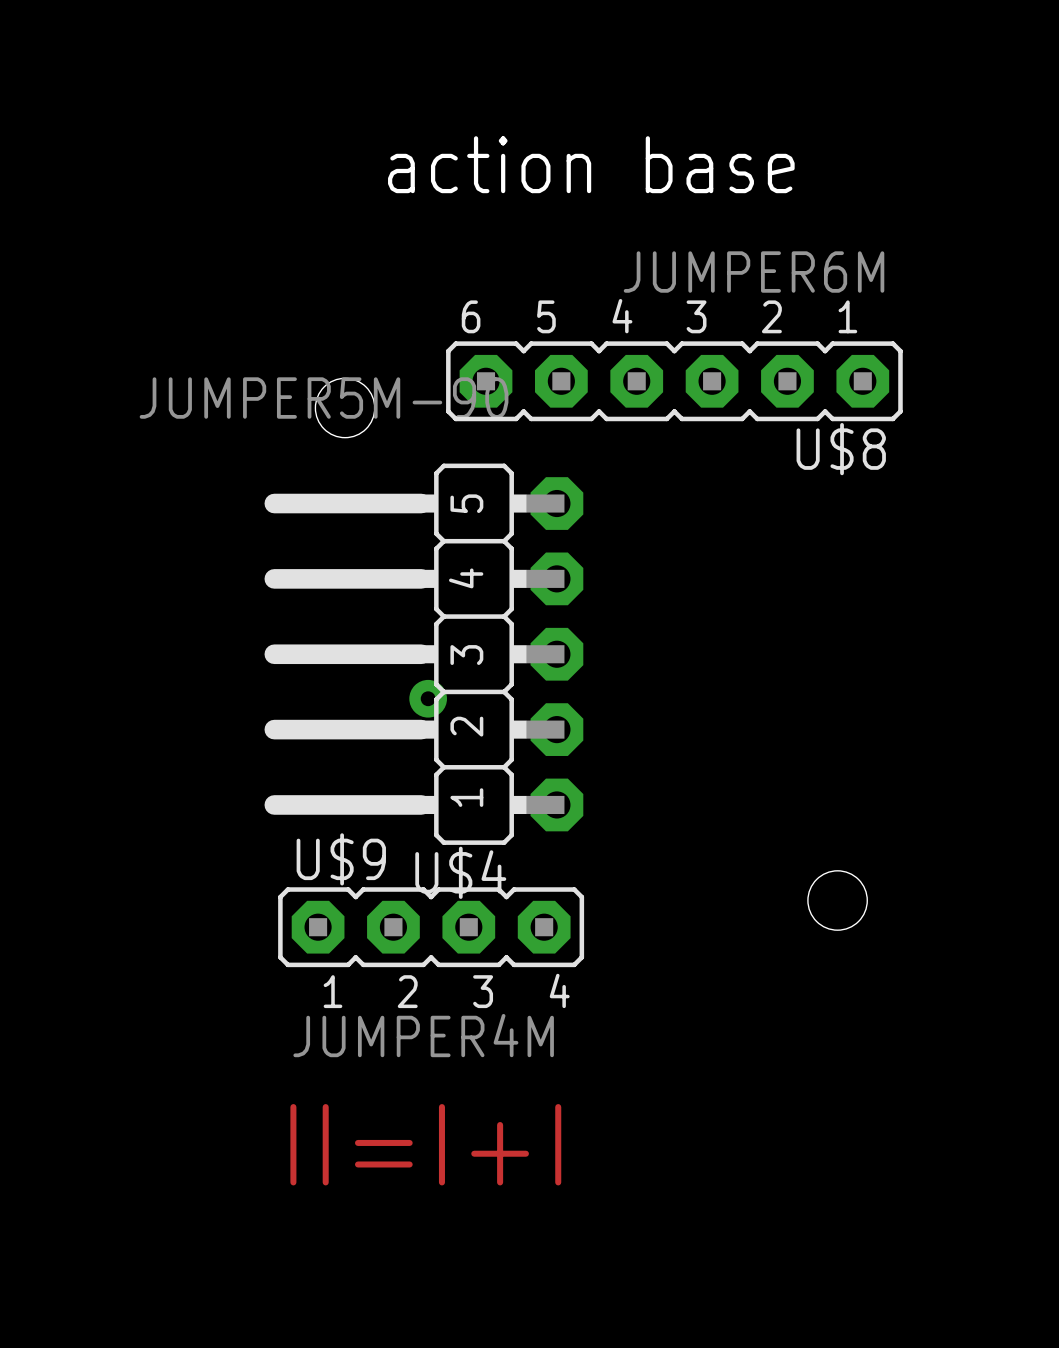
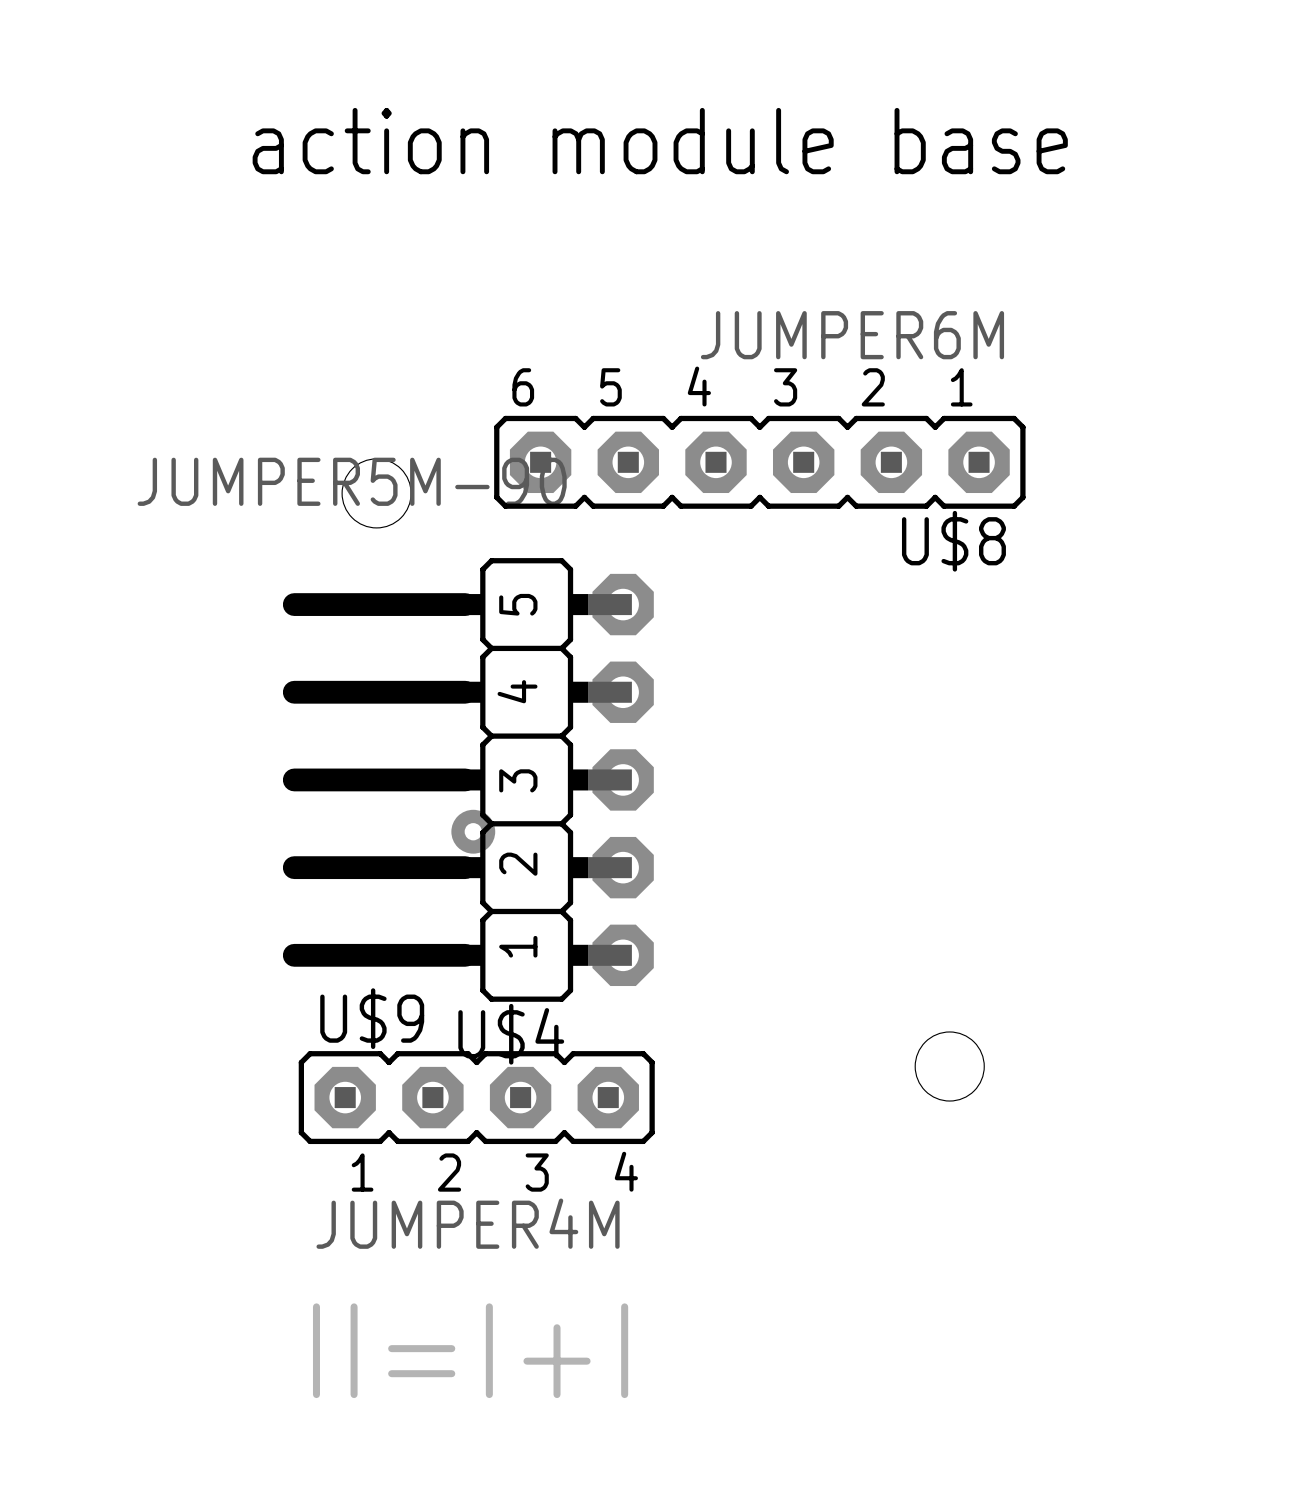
text: action base (591, 164) -> action module base (660, 141)

